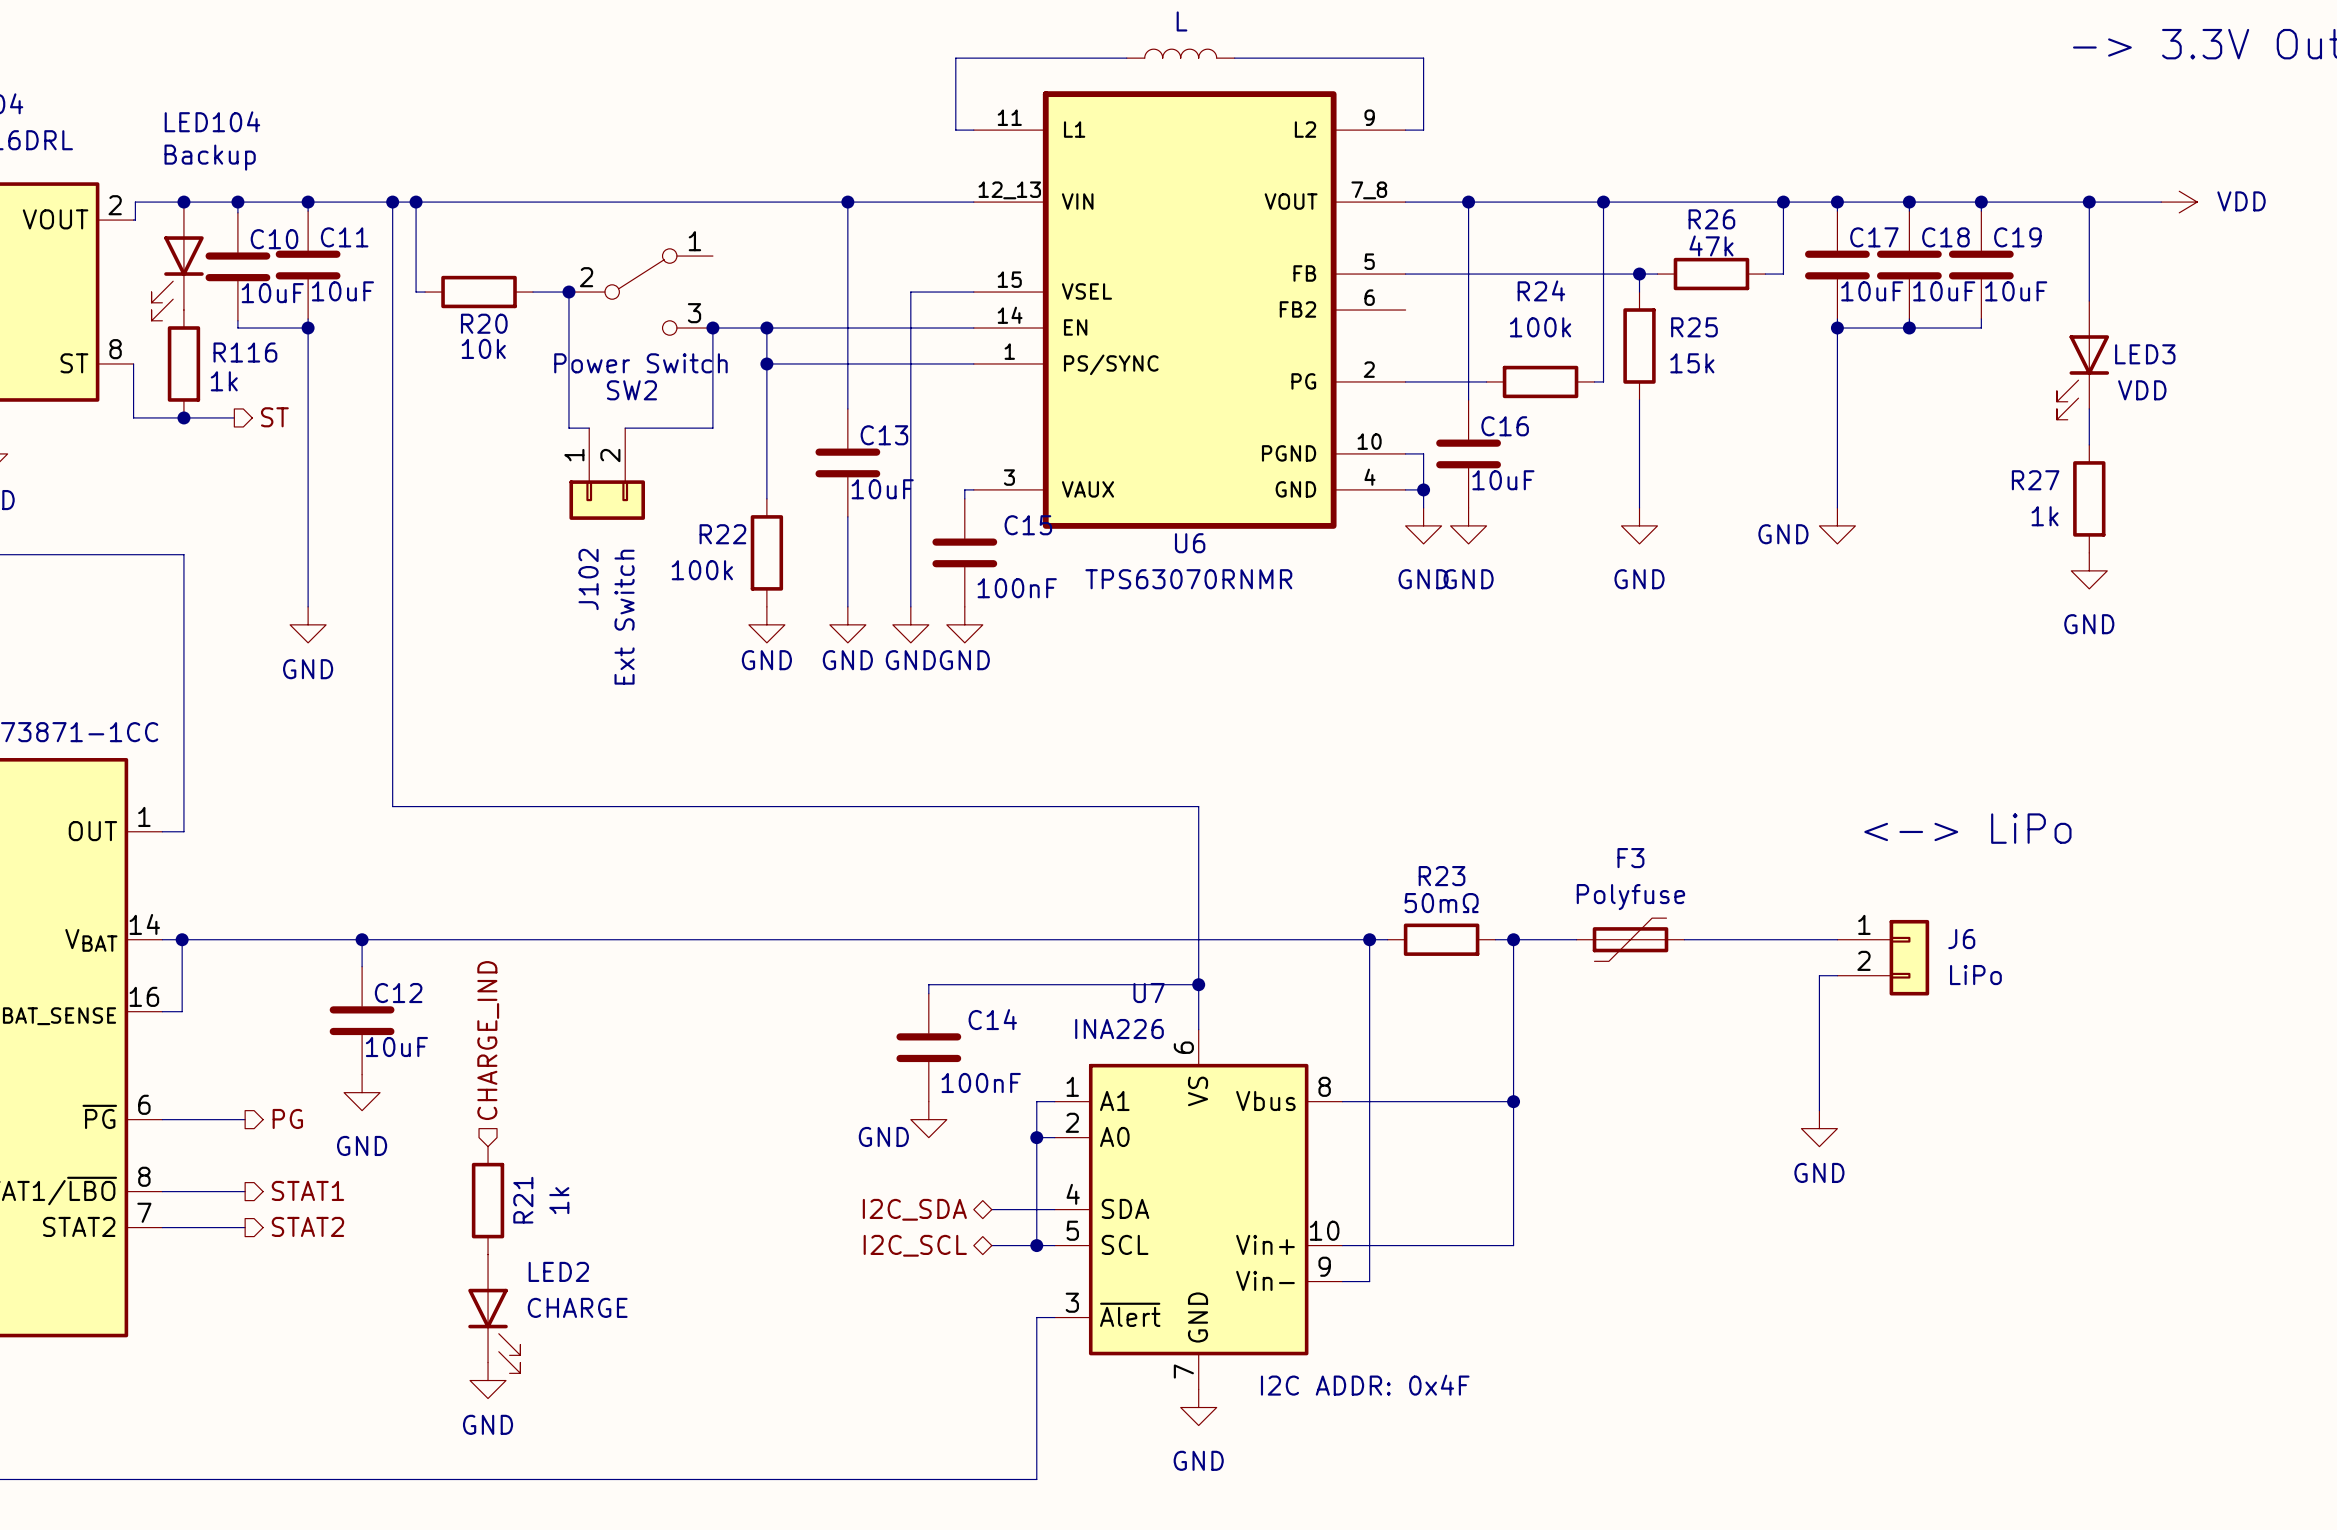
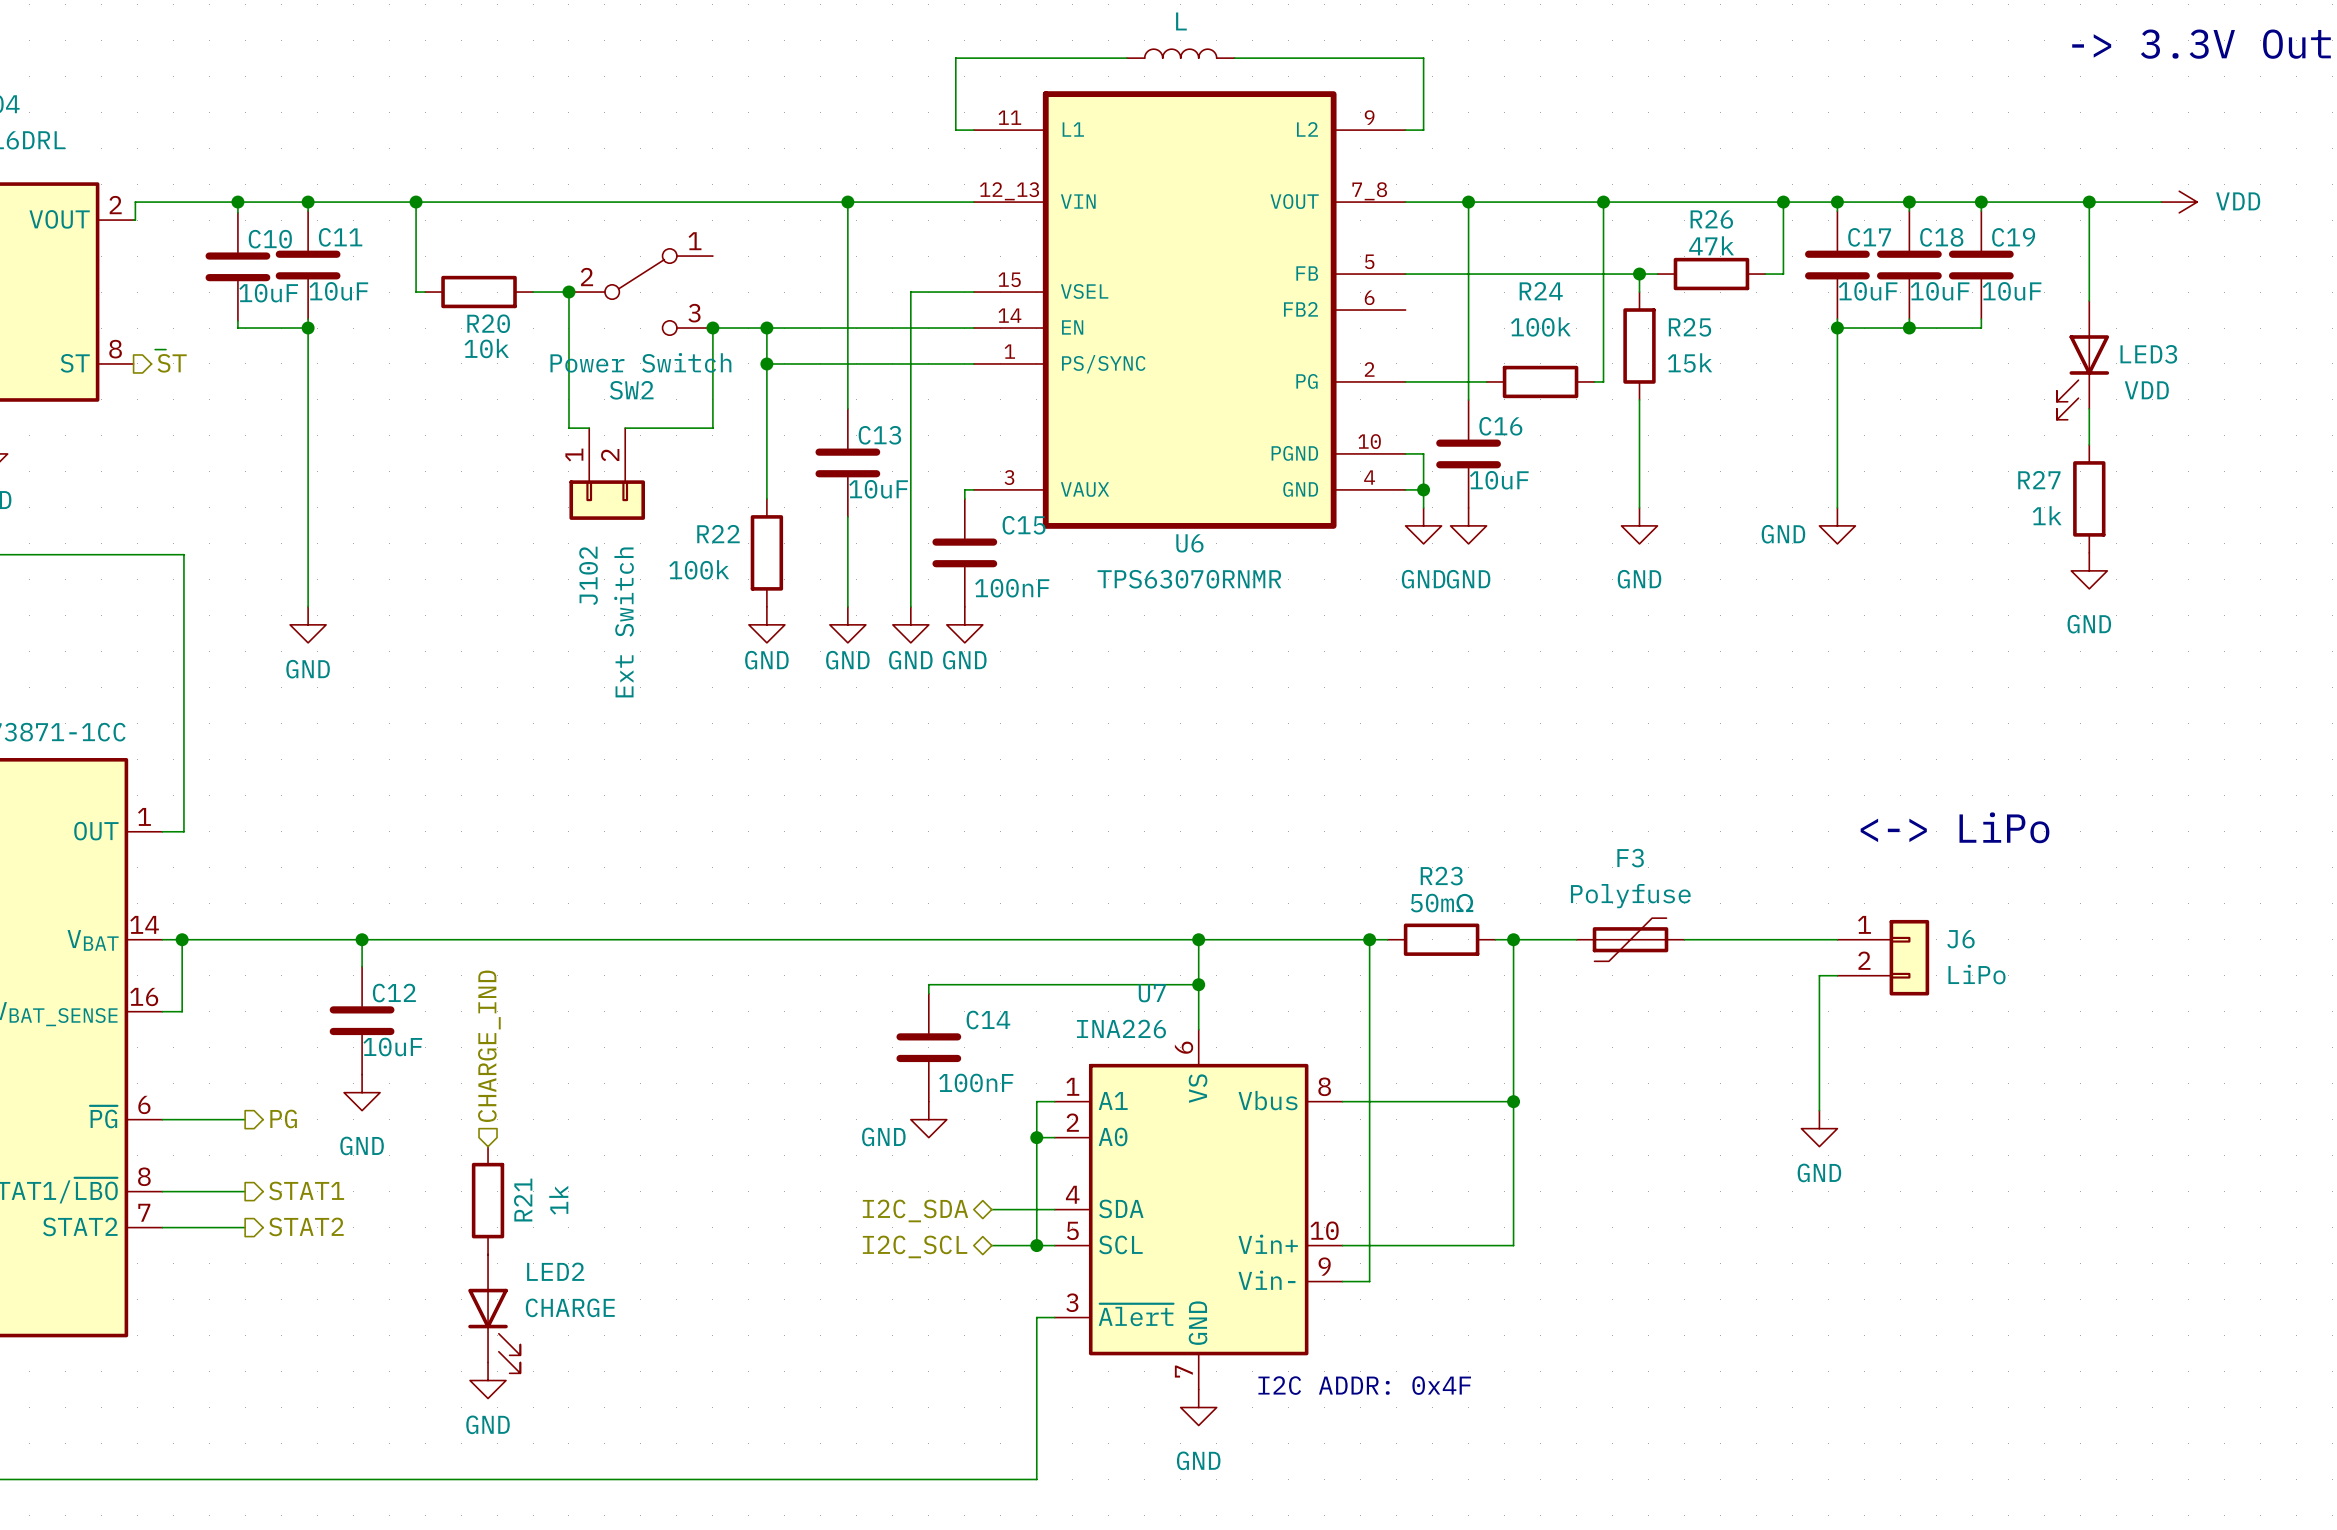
junction: (183, 202) -> none
wire: (392, 202) (392, 806) (1198, 806) (1198, 939) -> none
junction: (392, 202) -> none
LED104: Backup (177, 261) -> none
wire: none -> (155, 349) (165, 349)
wire: (133, 363) (133, 417) (234, 417) -> none
R116: 1k (183, 363) -> none
junction: (183, 417) -> none
hierarchical label position: ST (274, 417) -> ST (172, 363)
junction: none -> (1198, 939)

